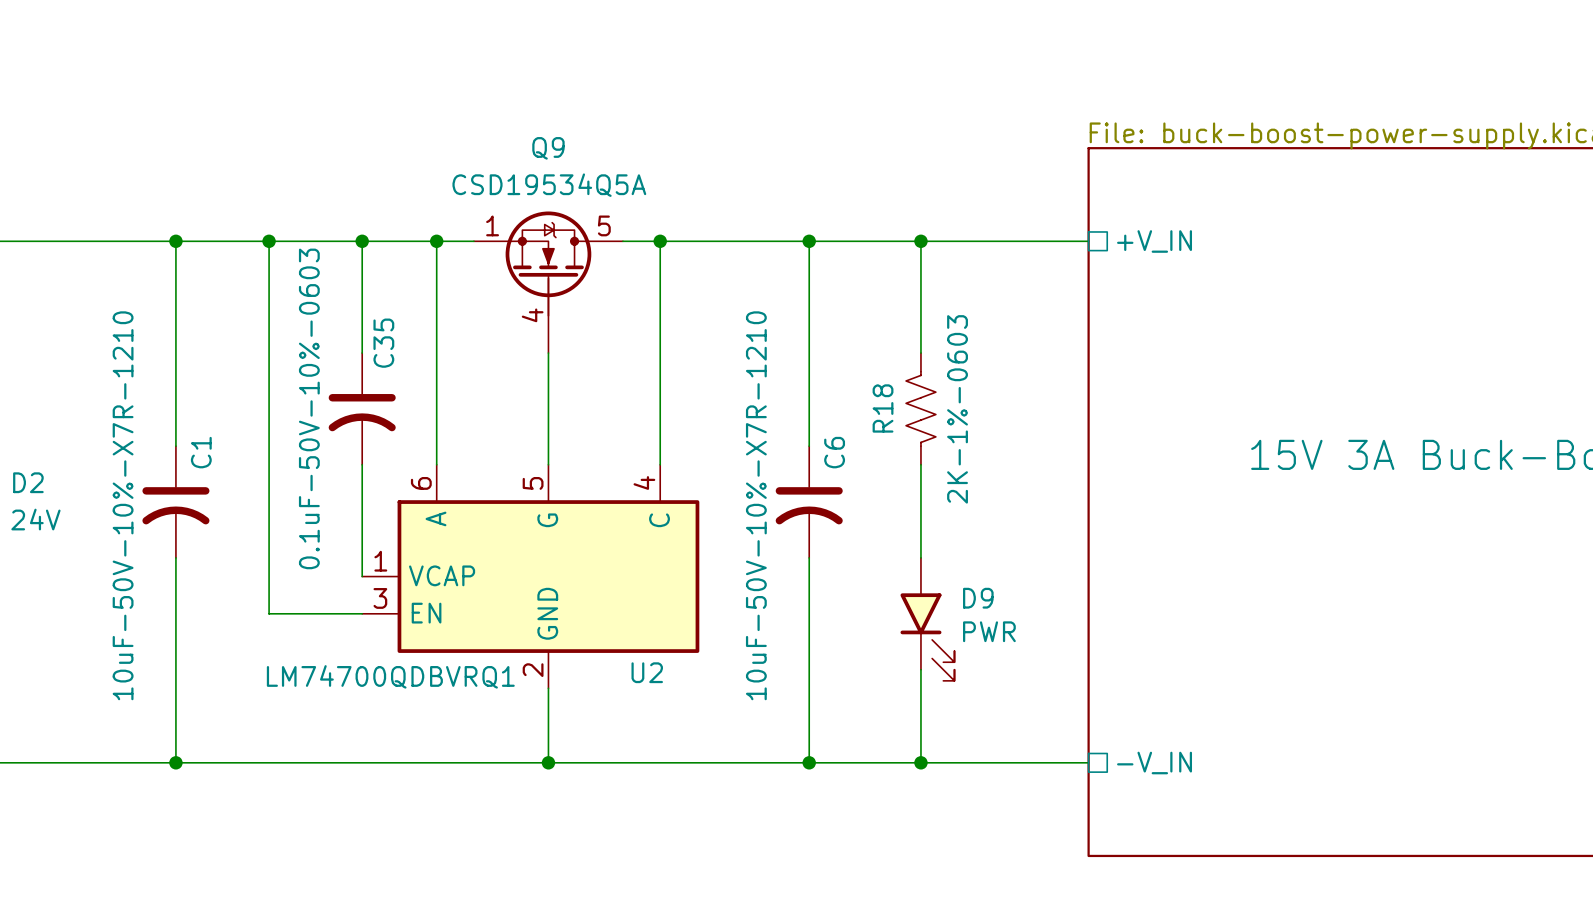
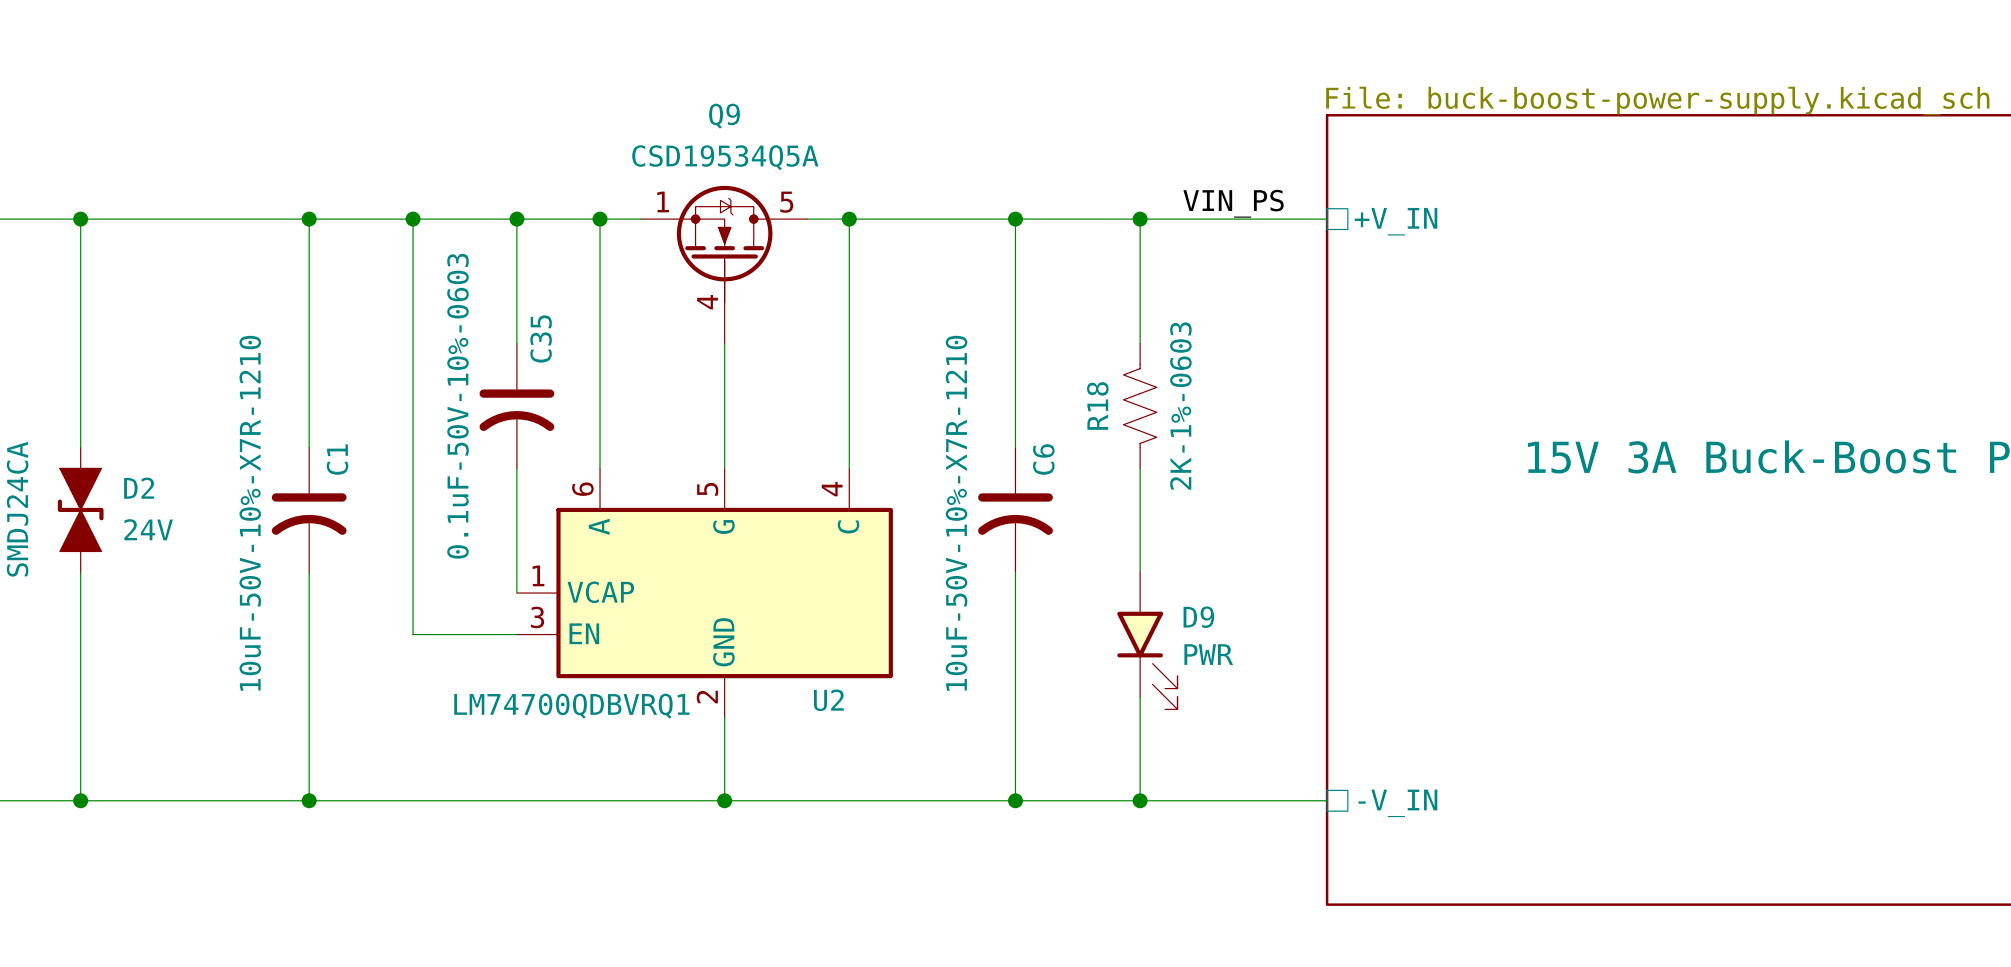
label: none -> VIN_PS (1233, 203)

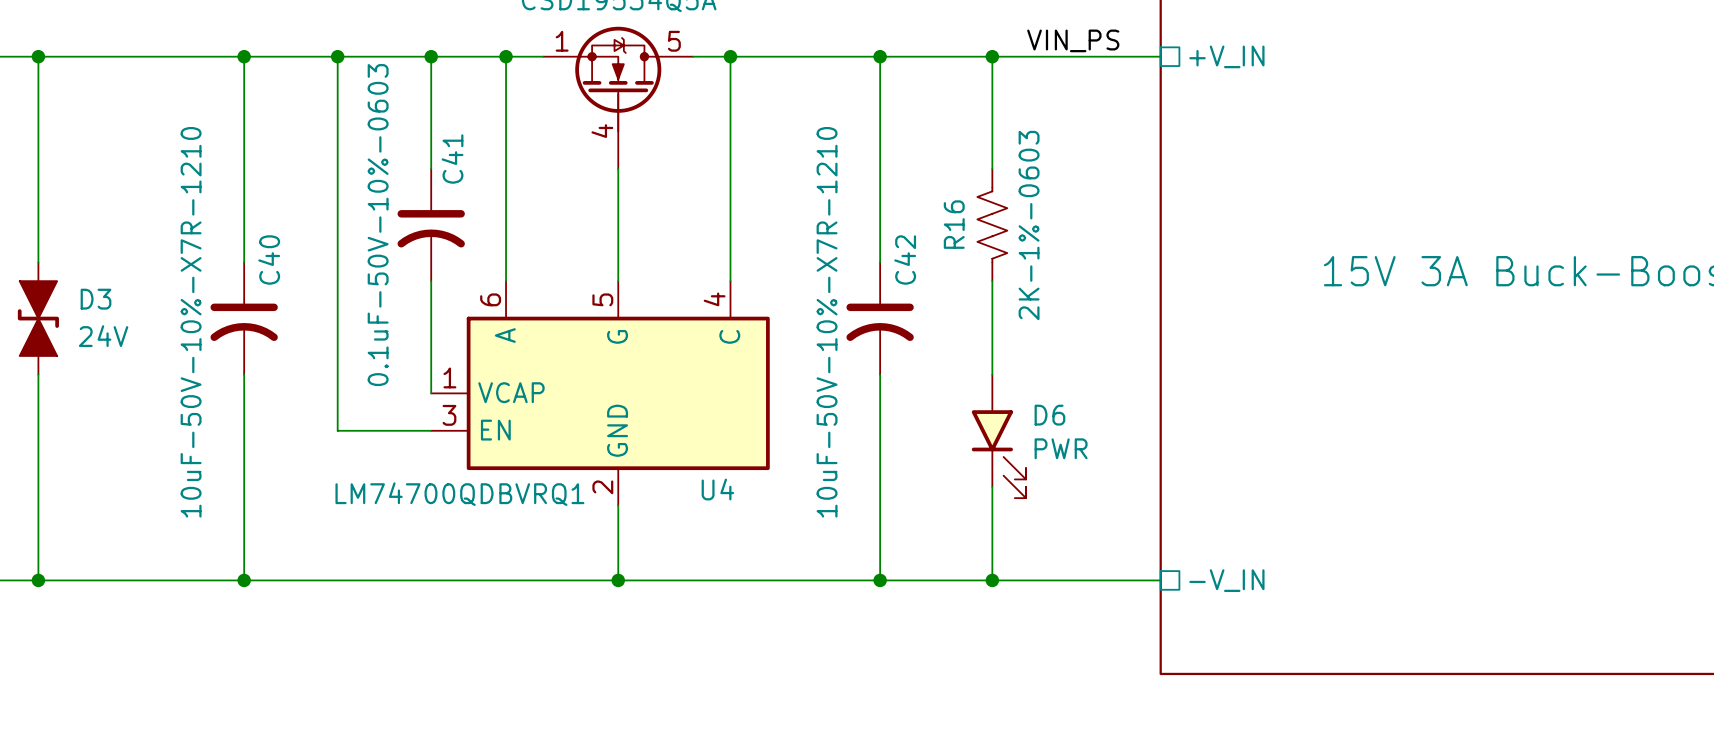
C35 name: C35 (541, 338) -> C41 (452, 158)
R18 name: R18 (1097, 405) -> R16 (954, 224)
C1 name: C1 (337, 459) -> C40 (269, 259)
C6 name: C6 (1043, 459) -> C42 (905, 259)
D2 name: D2 (139, 488) -> D3 (96, 299)
D9 name: D9 (1198, 617) -> D6 (1049, 415)
U2 name: U2 (828, 700) -> U4 (717, 489)

